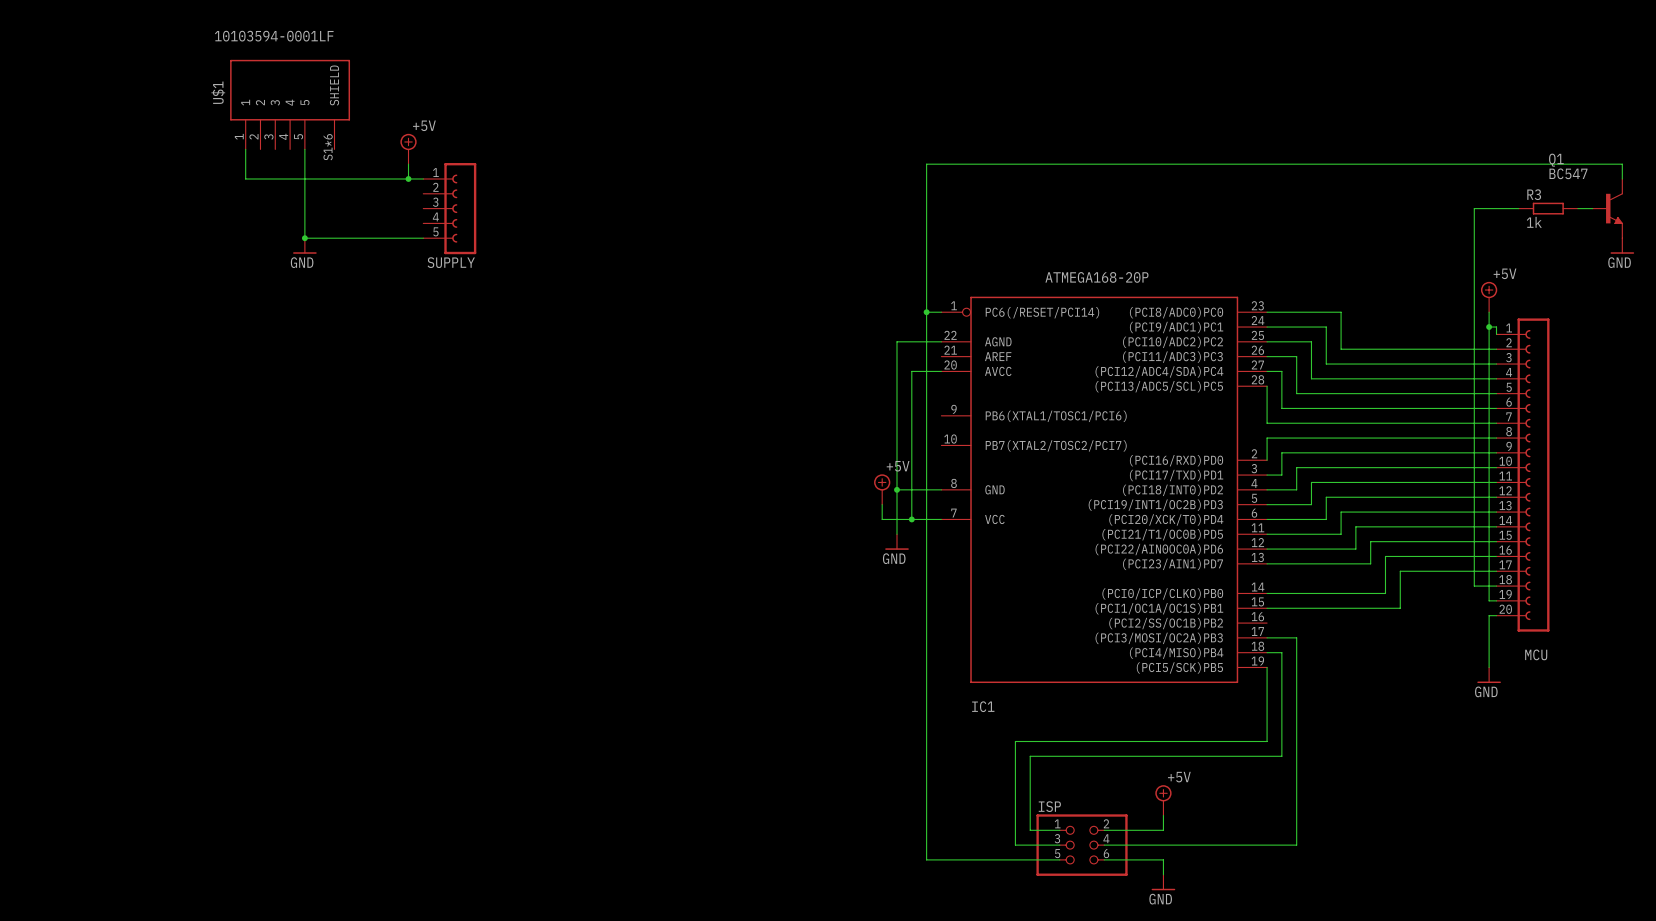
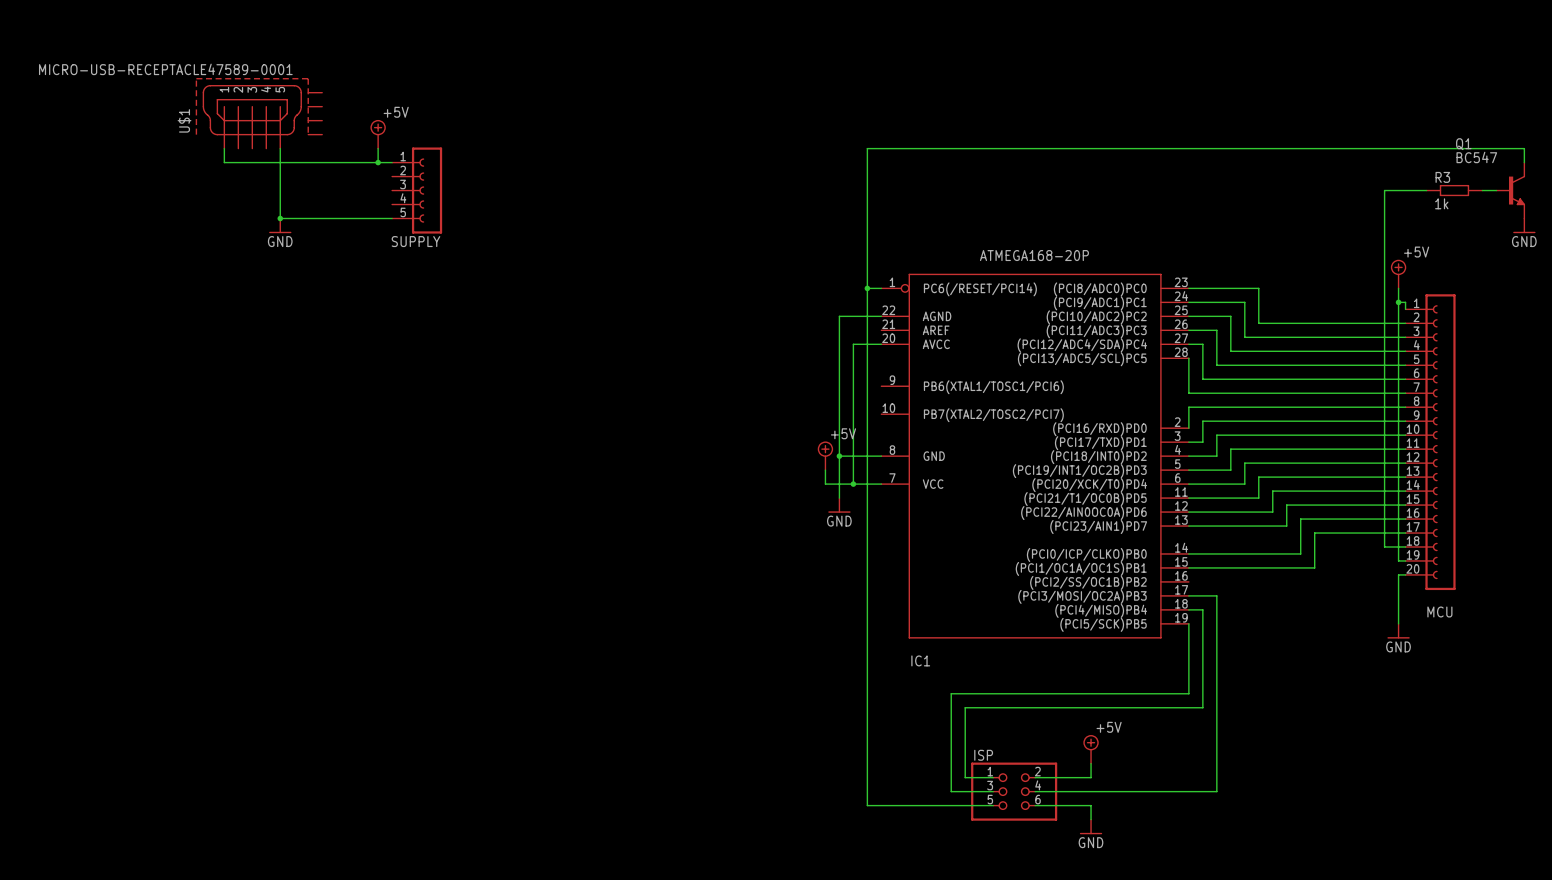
U$1 value: 10103594-0001LF (274, 36) -> MICRO-USB-RECEPTACLE47589-0001 (165, 69)
U$1 symbol: [230, 59, 351, 150] -> [195, 78, 323, 149]
U$1 name position: U$1 (218, 92) -> U$1 (184, 120)

